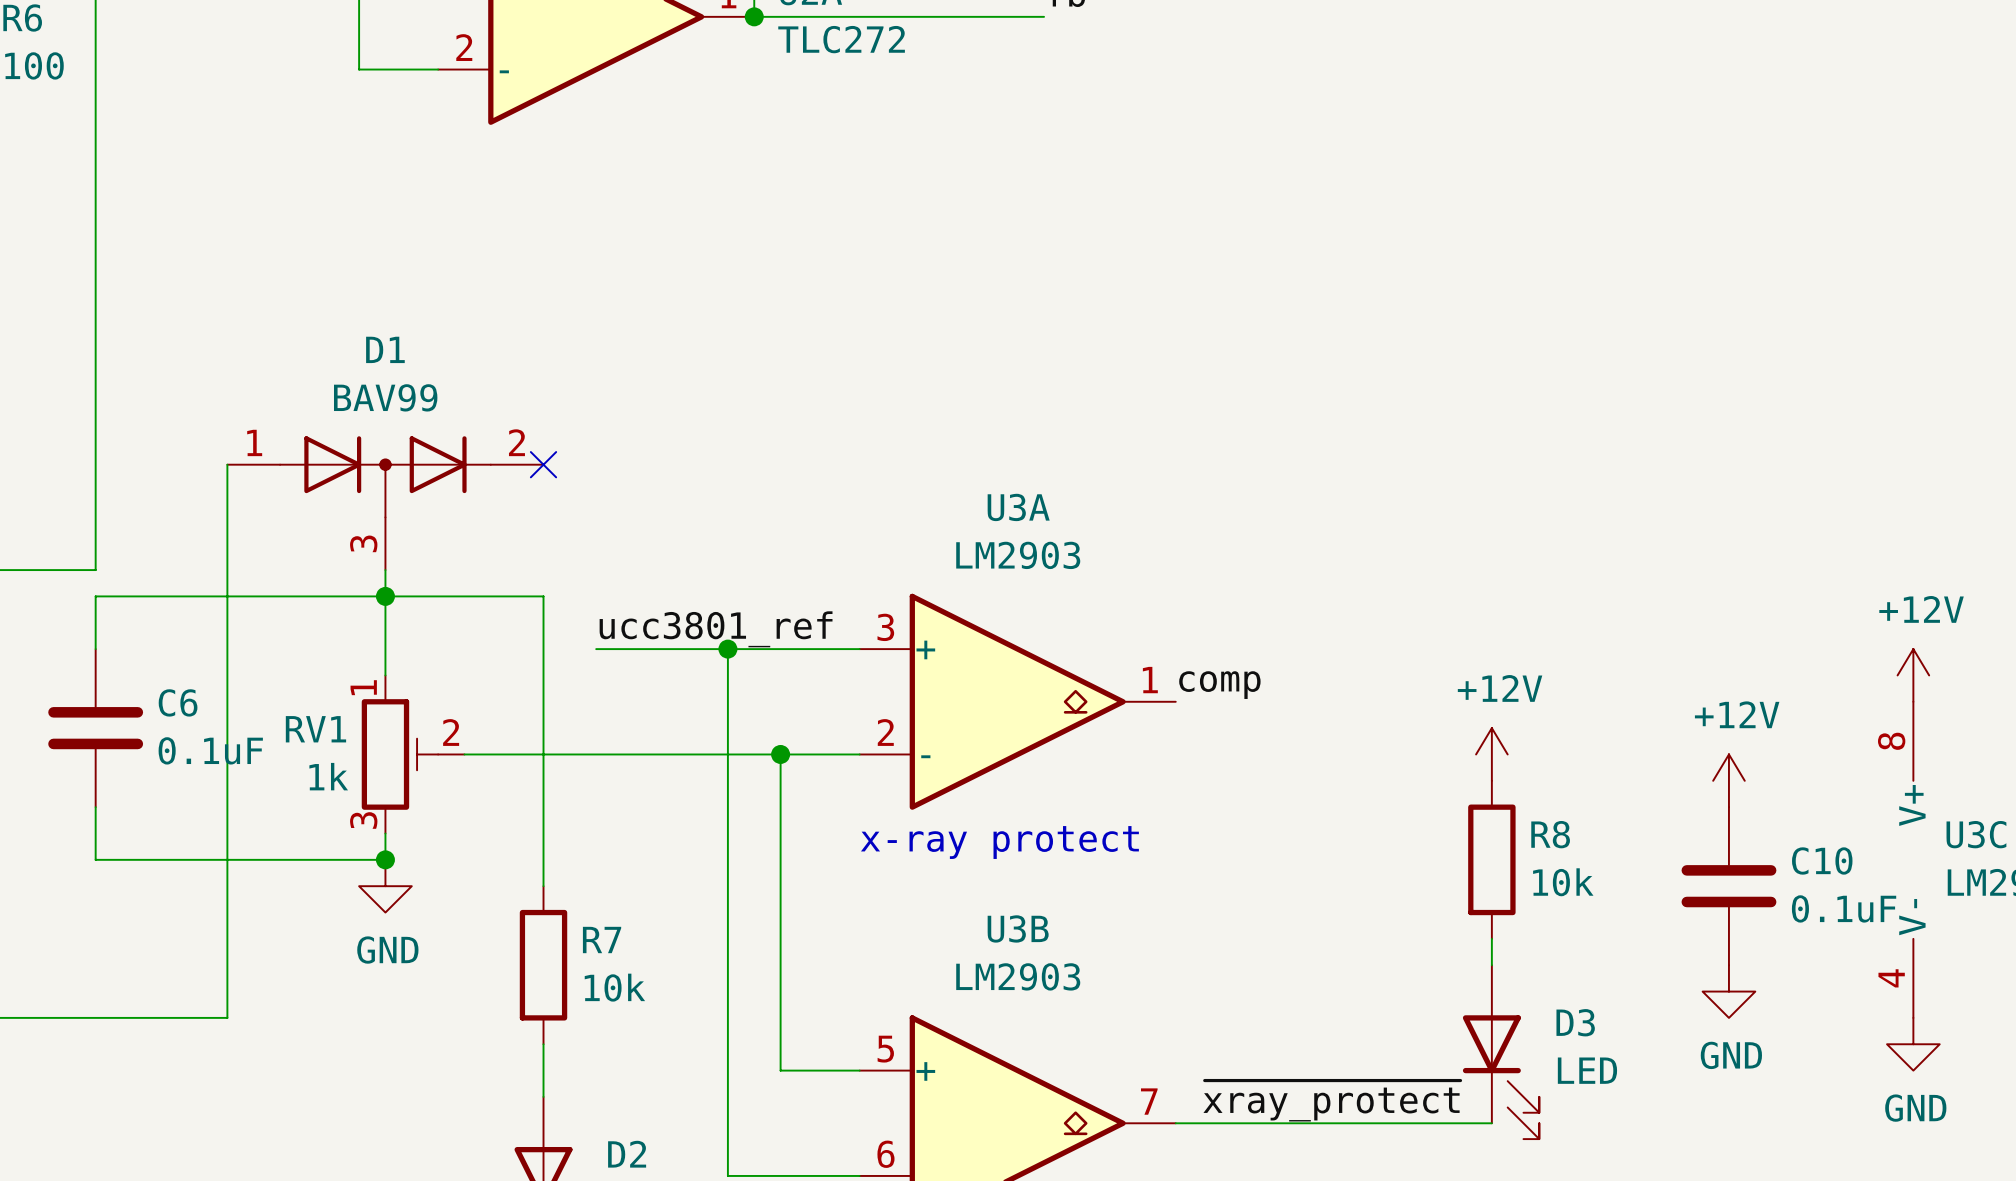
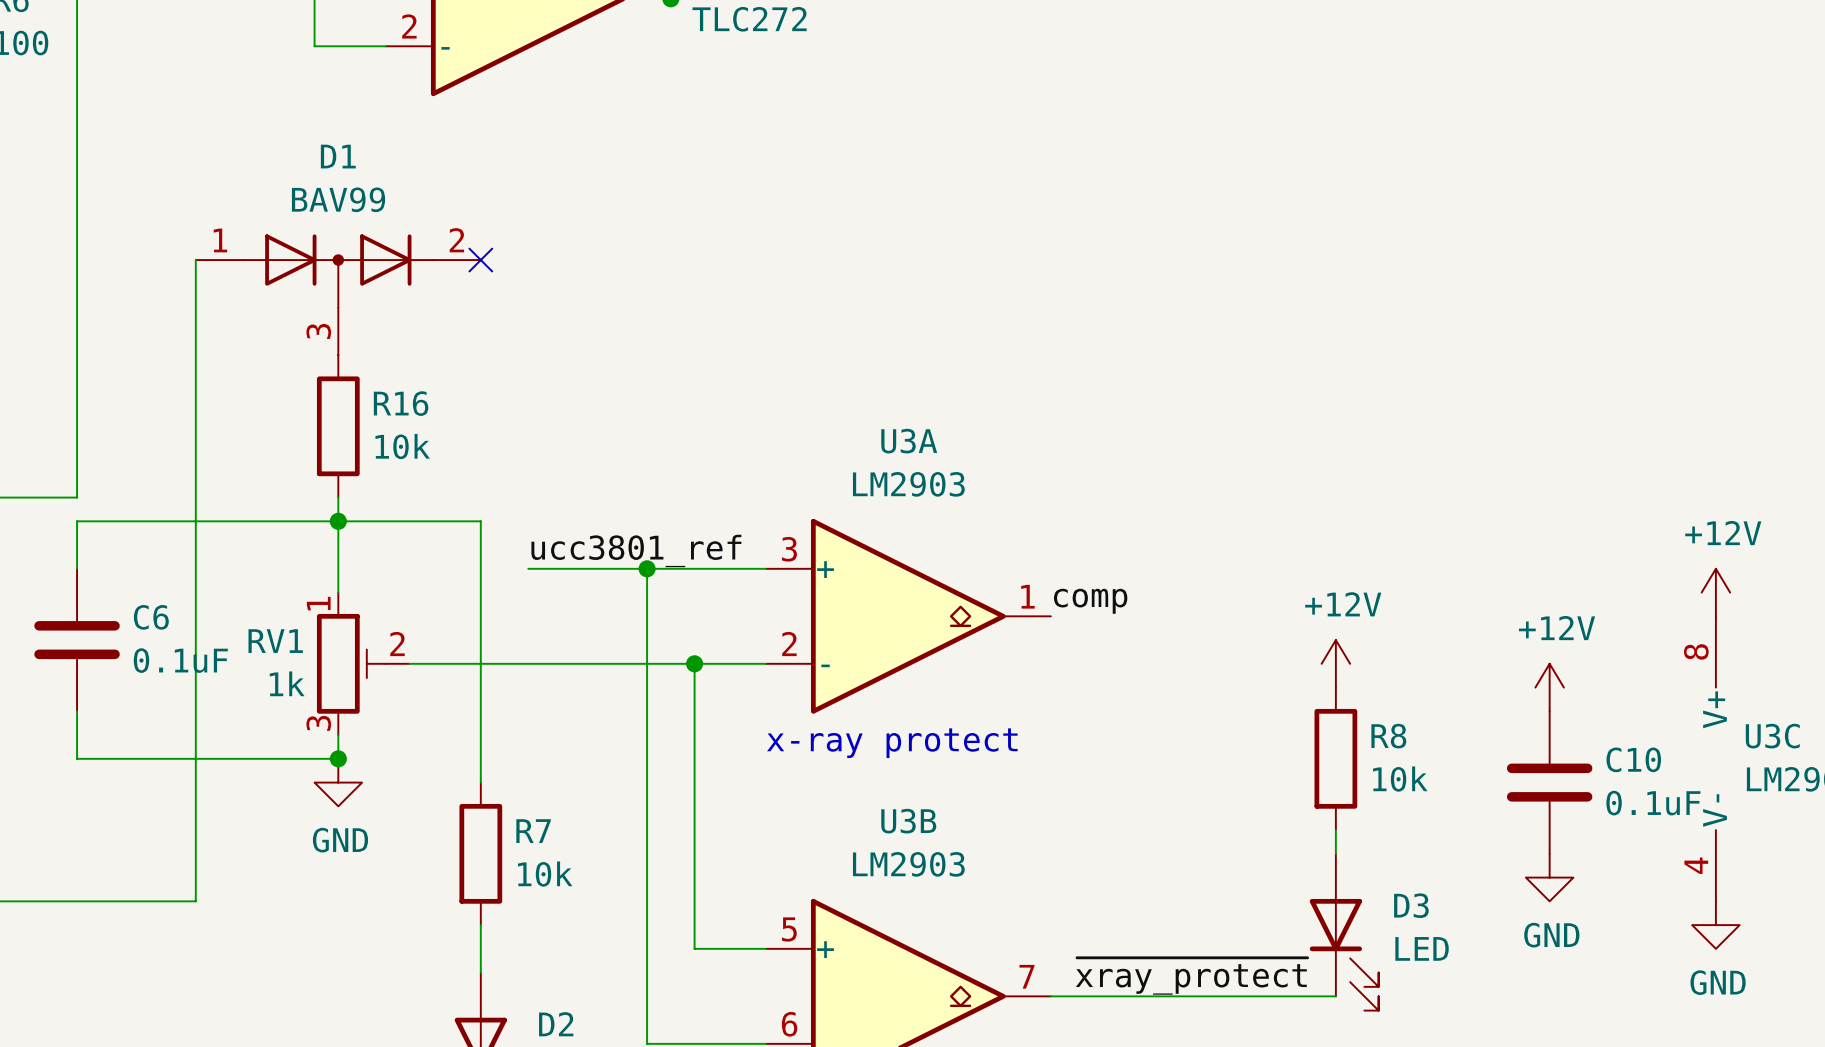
wire: none -> (195, 260) (195, 402)
no-connect mark: none -> (480, 260)
no-connect mark: (543, 464) -> none
R16: none -> 10k (338, 426)
D1 position: (385, 503) -> (338, 294)

